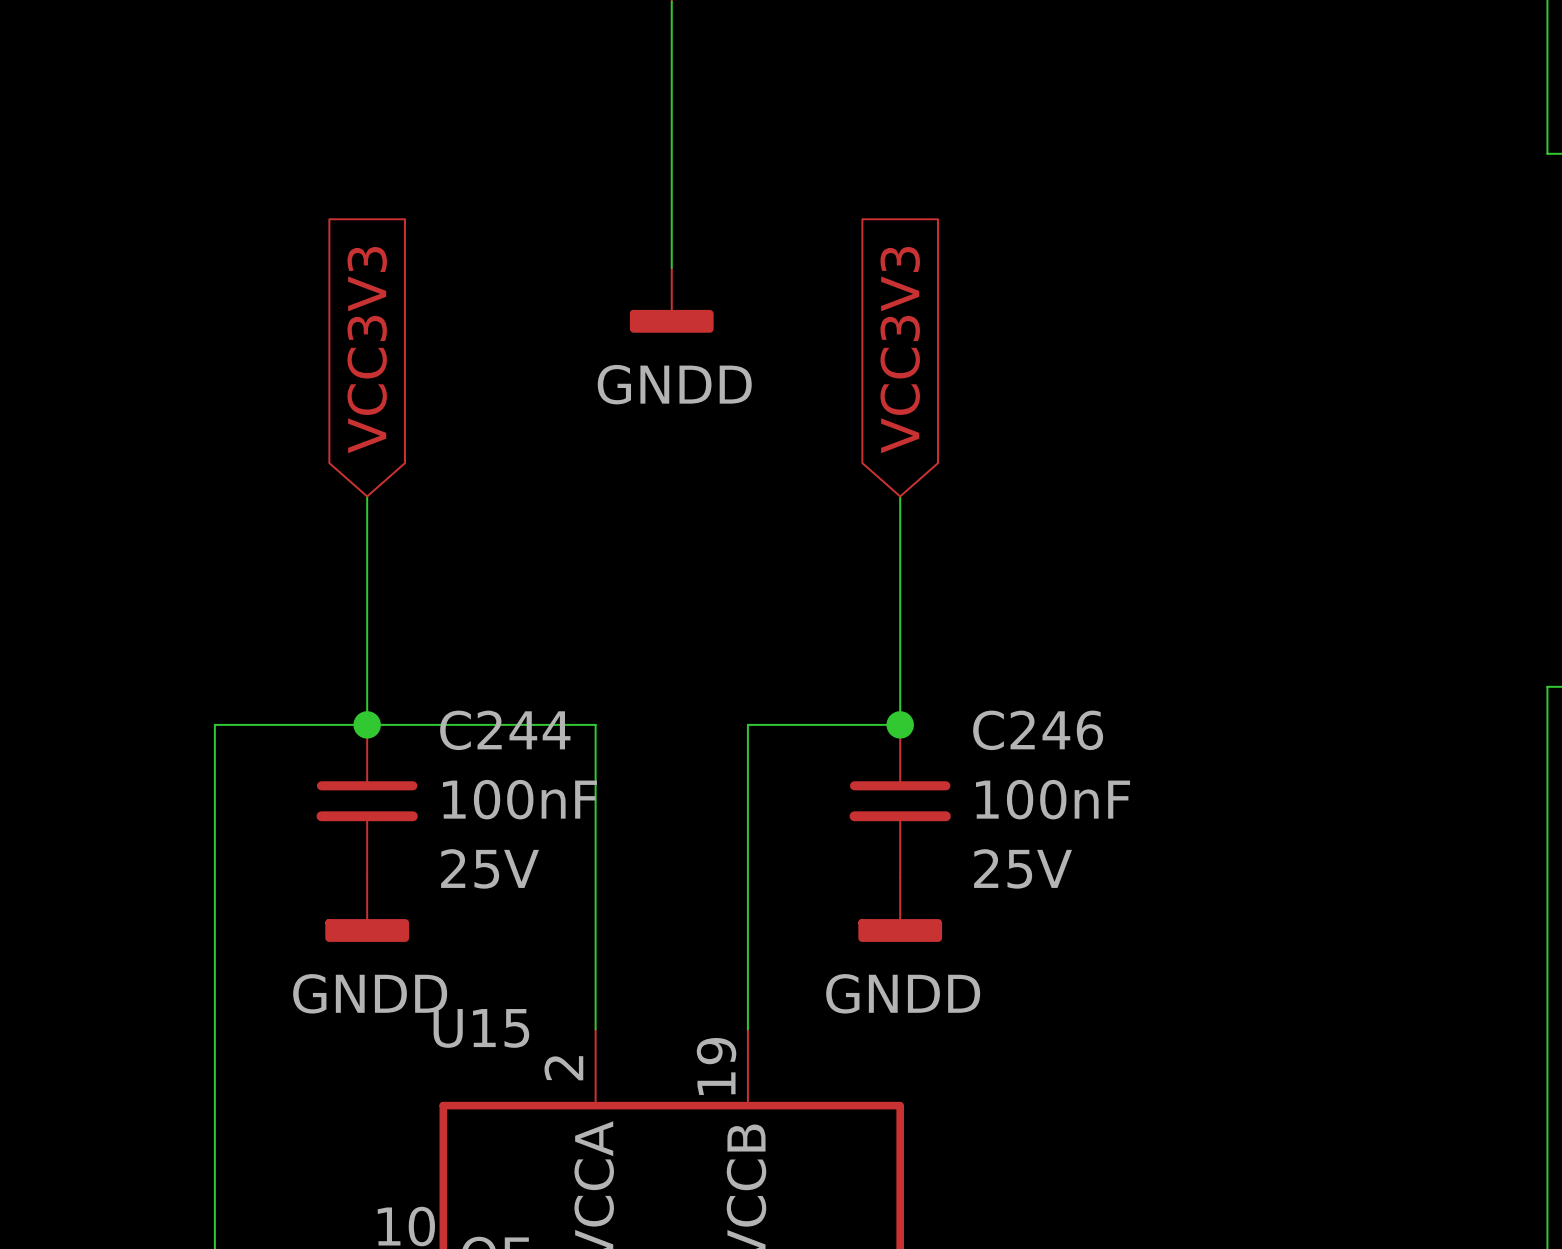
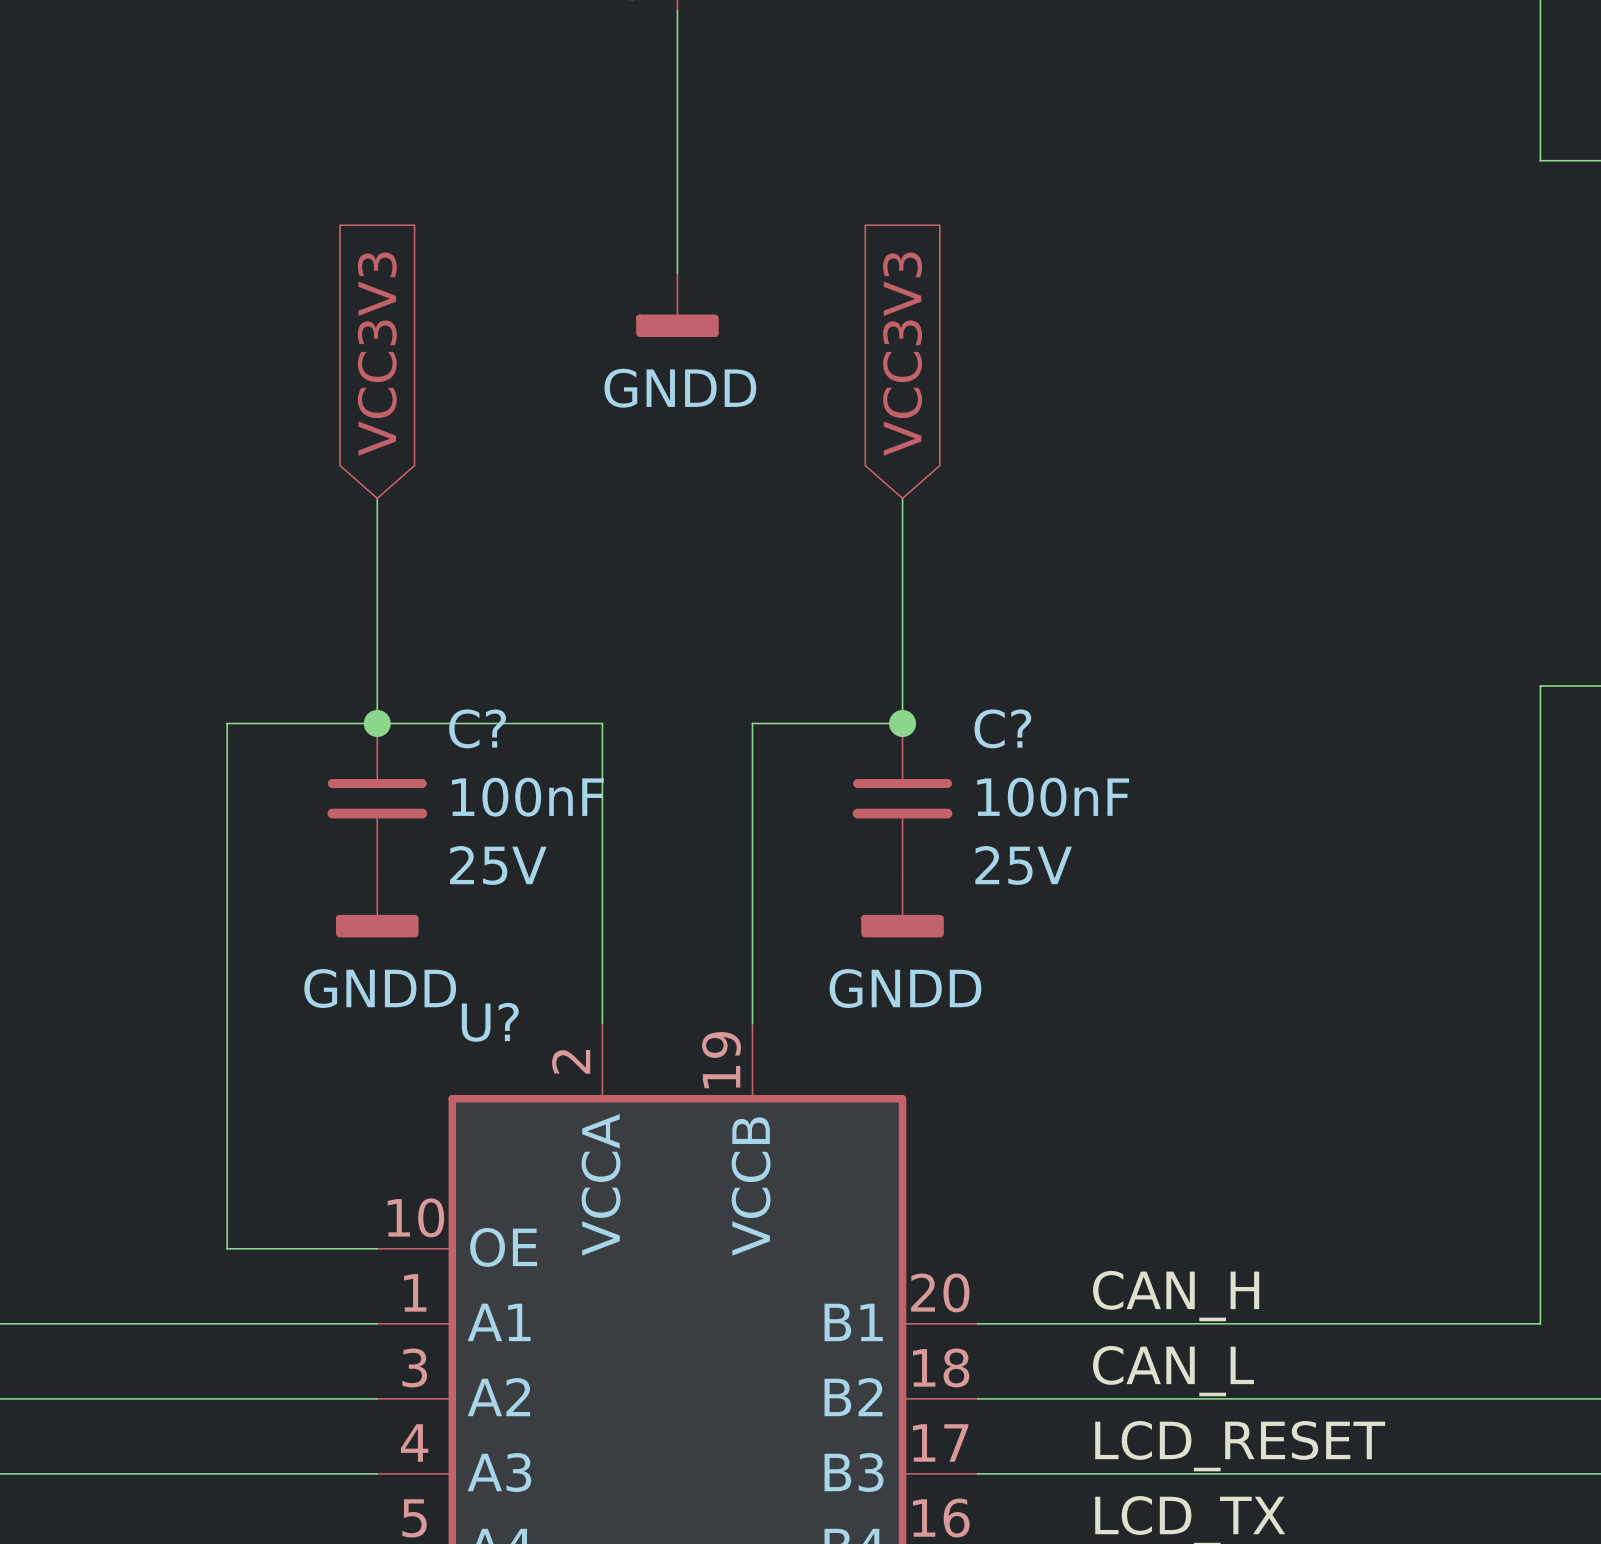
C244 name: C244 (505, 730) -> C? (477, 728)
C246 name: C246 (1038, 730) -> C? (1002, 728)
U15 name: U15 (481, 1028) -> U? (490, 1022)

